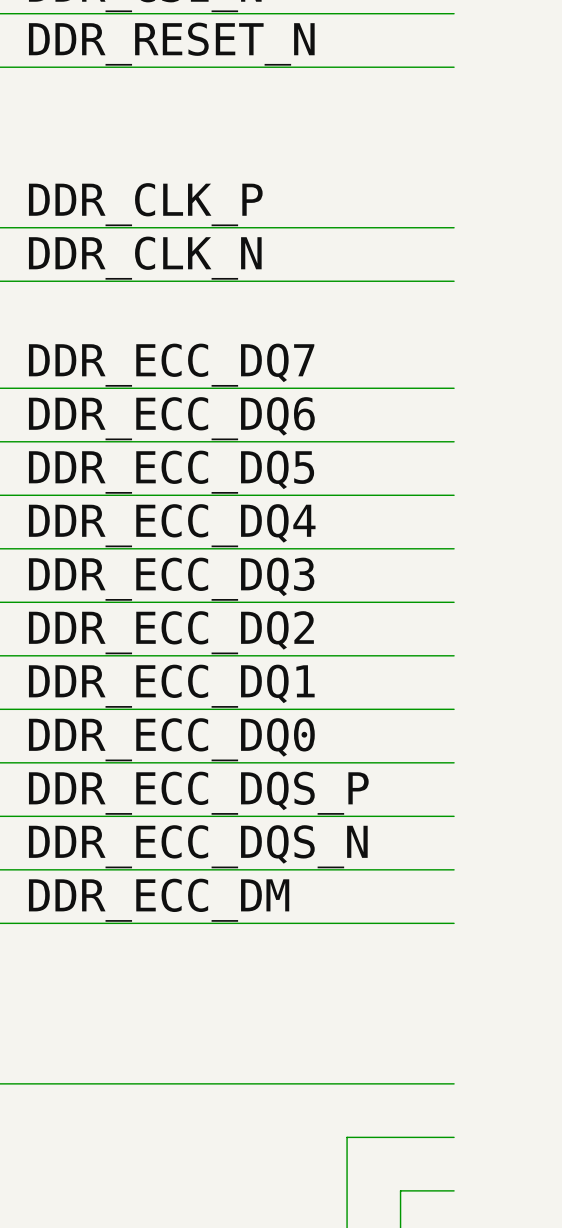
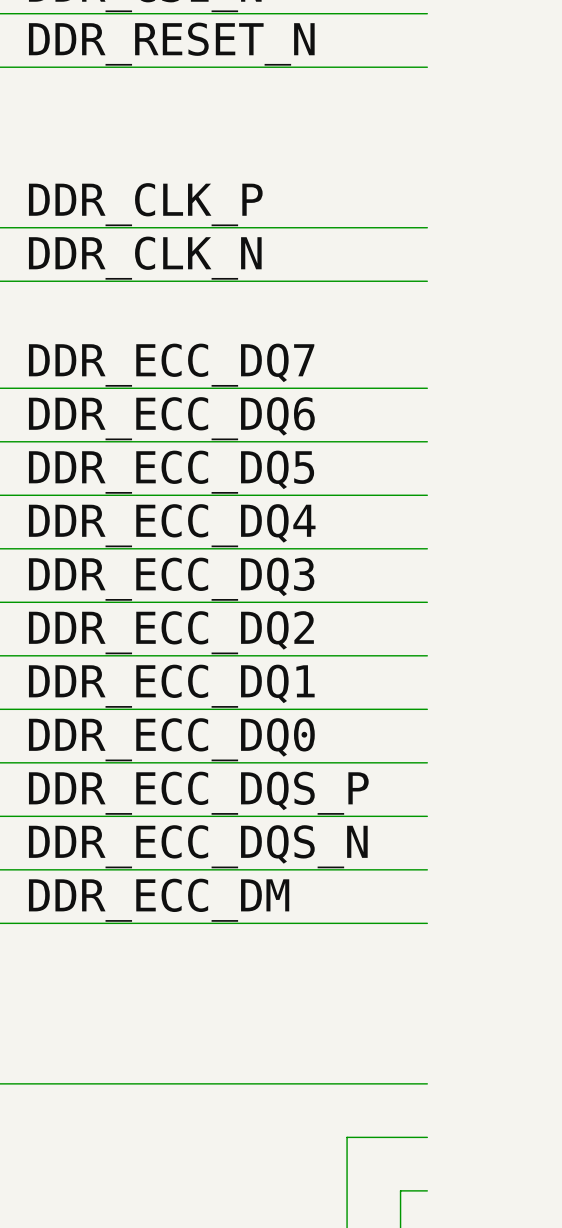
wire: (427, 13) (454, 13) -> none
wire: (427, 67) (454, 67) -> none
wire: (427, 227) (454, 227) -> none
wire: (427, 281) (454, 281) -> none
wire: (427, 388) (454, 388) -> none
wire: (427, 441) (454, 441) -> none
wire: (427, 495) (454, 495) -> none
wire: (427, 548) (454, 548) -> none
wire: (427, 602) (454, 602) -> none
wire: (427, 655) (454, 655) -> none
wire: (427, 709) (454, 709) -> none
wire: (427, 762) (454, 762) -> none
wire: (427, 816) (454, 816) -> none
wire: (427, 869) (454, 869) -> none
wire: (427, 923) (454, 923) -> none
wire: (427, 1083) (454, 1083) -> none
wire: (427, 1137) (454, 1137) -> none
wire: (427, 1190) (454, 1190) -> none

